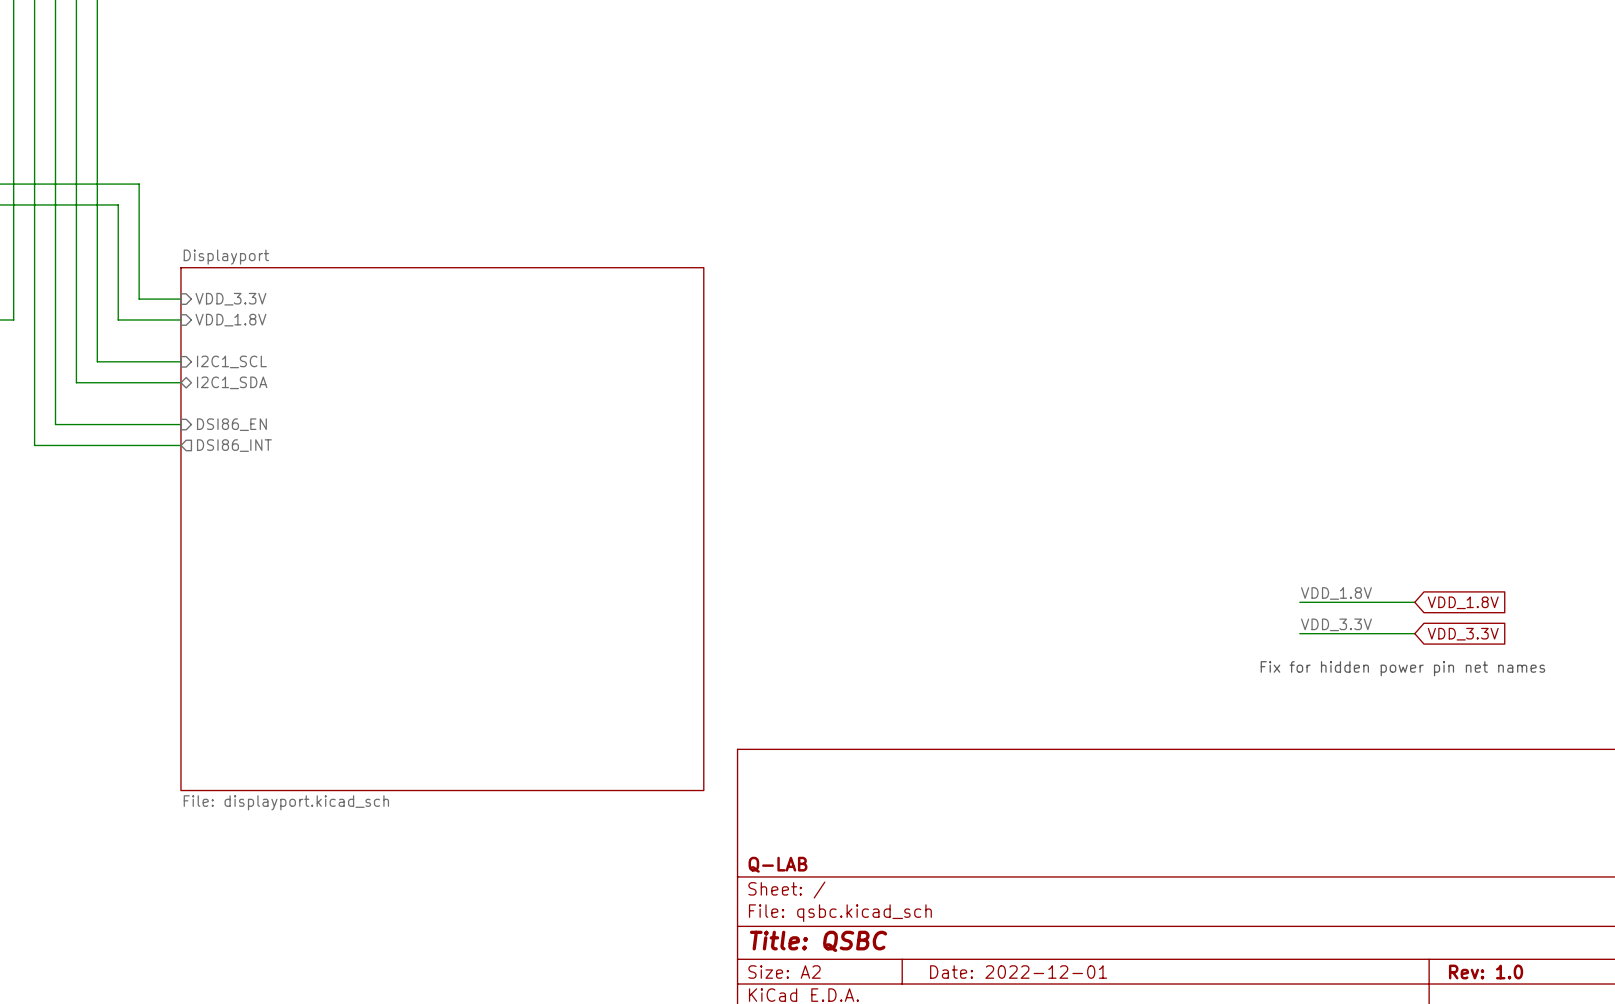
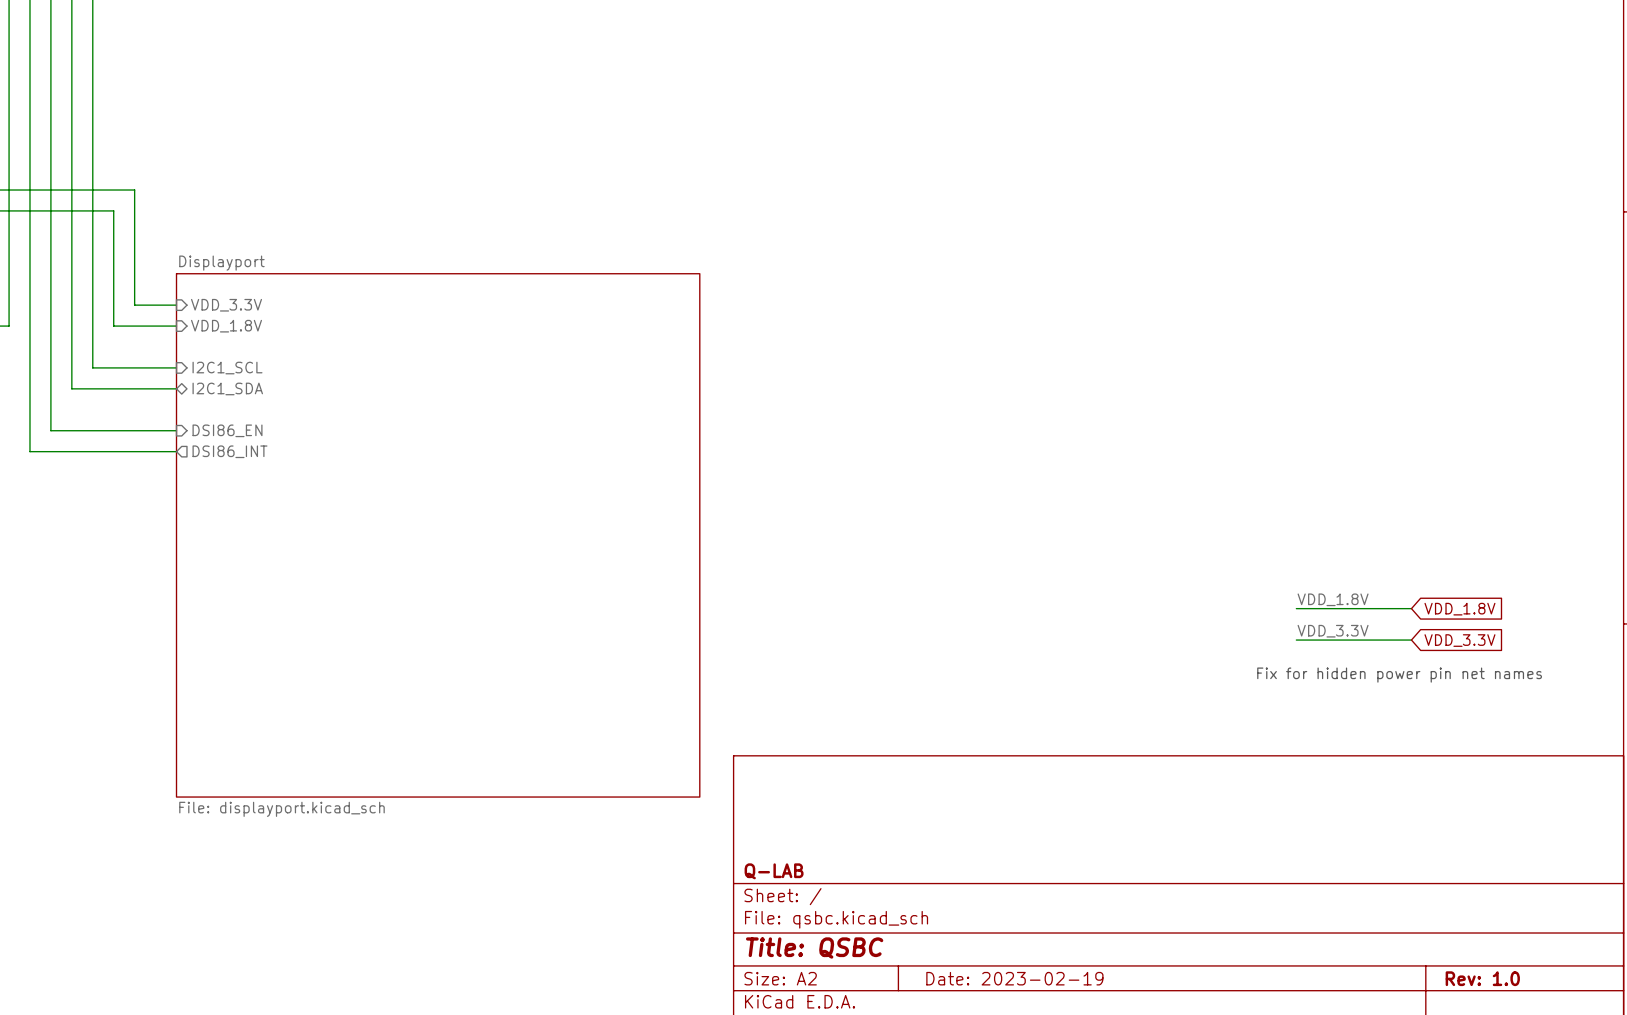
title block: Date: 2022-12-01 (1018, 972) -> Date: 2023-02-19 (1014, 978)

